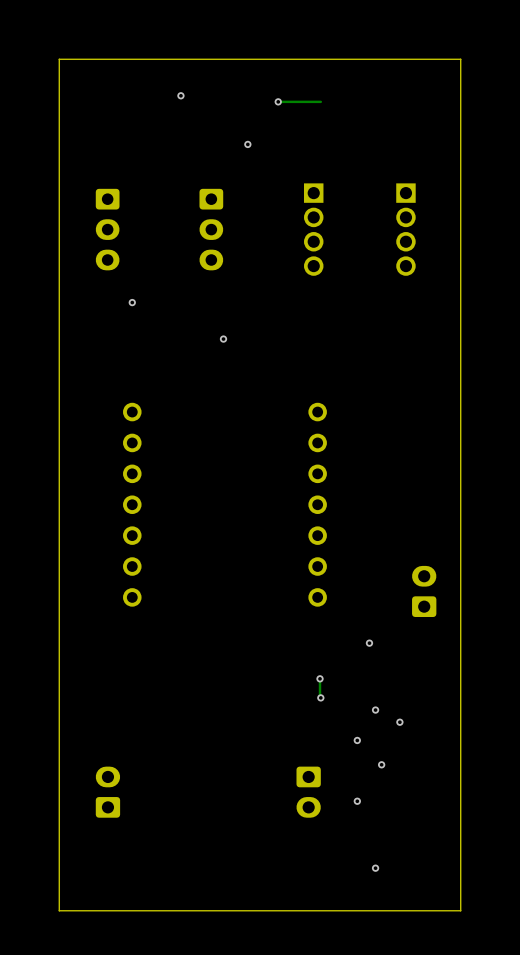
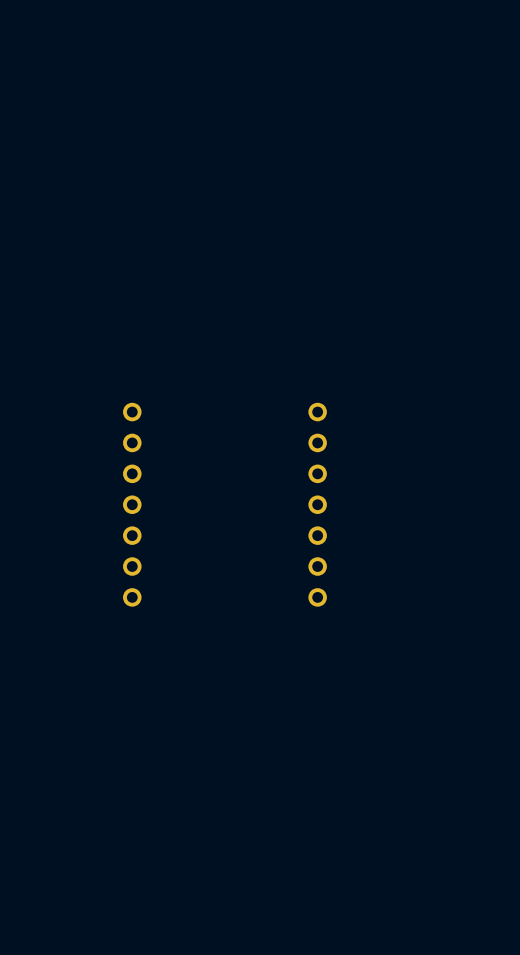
board edge: (460, 59) (59, 59) (59, 910) (460, 910) (460, 59) -> none
via: (180, 95) -> none
via: (278, 101) -> none
track: (320, 101) (278, 101) -> none
via: (247, 144) -> none
part: (107, 229) -> none
part: (211, 229) -> none
part: (313, 229) -> none
part: (405, 229) -> none
via: (132, 302) -> none
via: (223, 339) -> none
part: (424, 591) -> none
via: (369, 643) -> none
track: (320, 678) (320, 697) -> none
via: (320, 678) -> none
via: (320, 697) -> none
via: (375, 710) -> none
via: (399, 722) -> none
via: (357, 740) -> none
via: (381, 764) -> none
part: (107, 792) -> none
part: (308, 792) -> none
via: (357, 801) -> none
via: (375, 868) -> none

